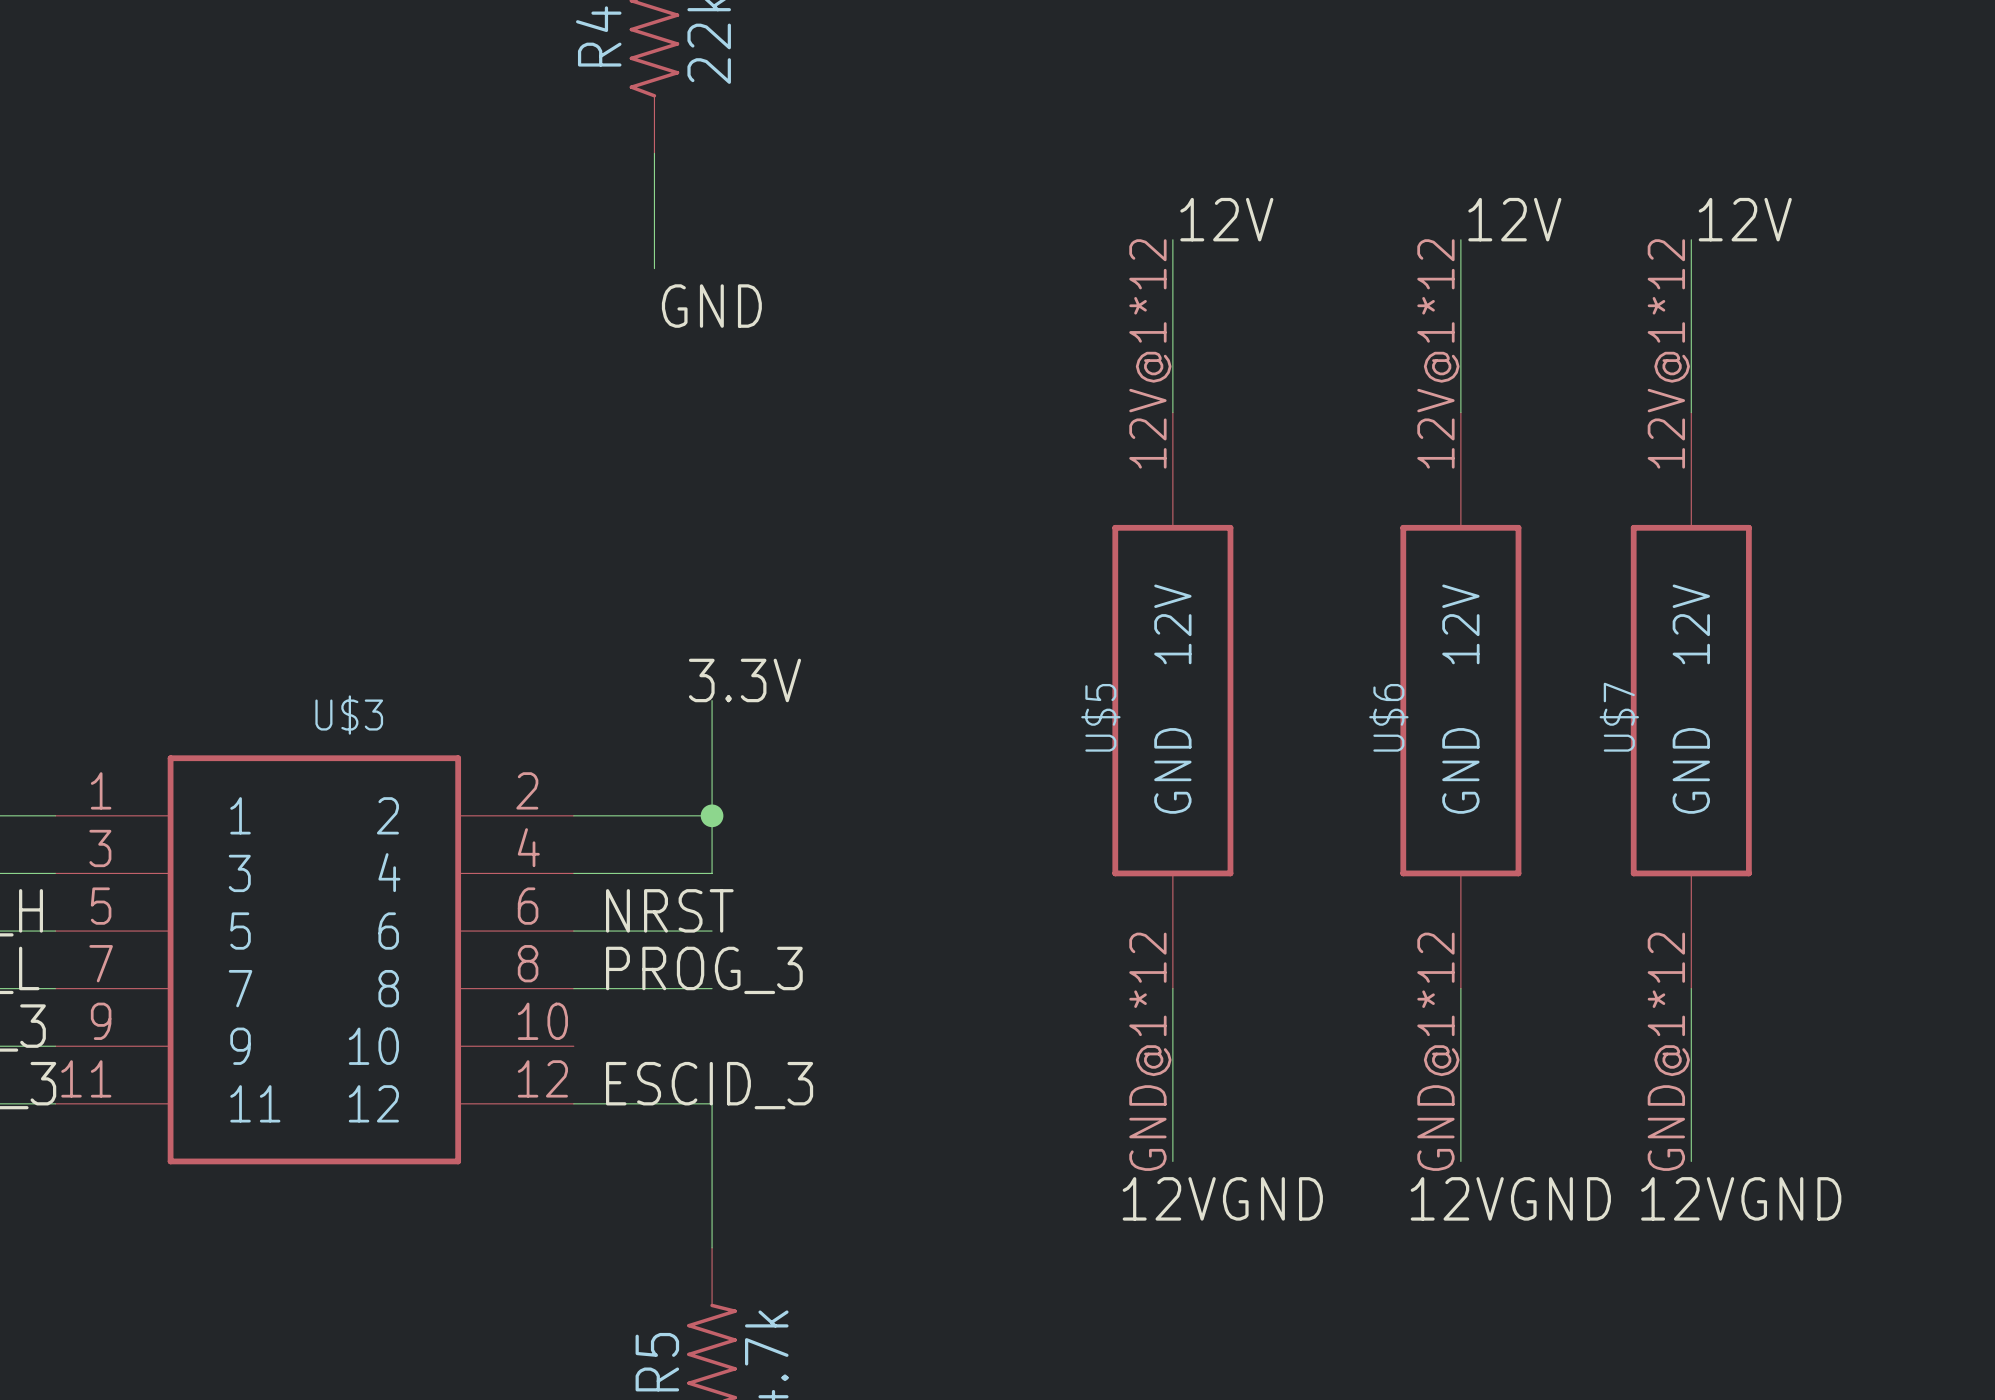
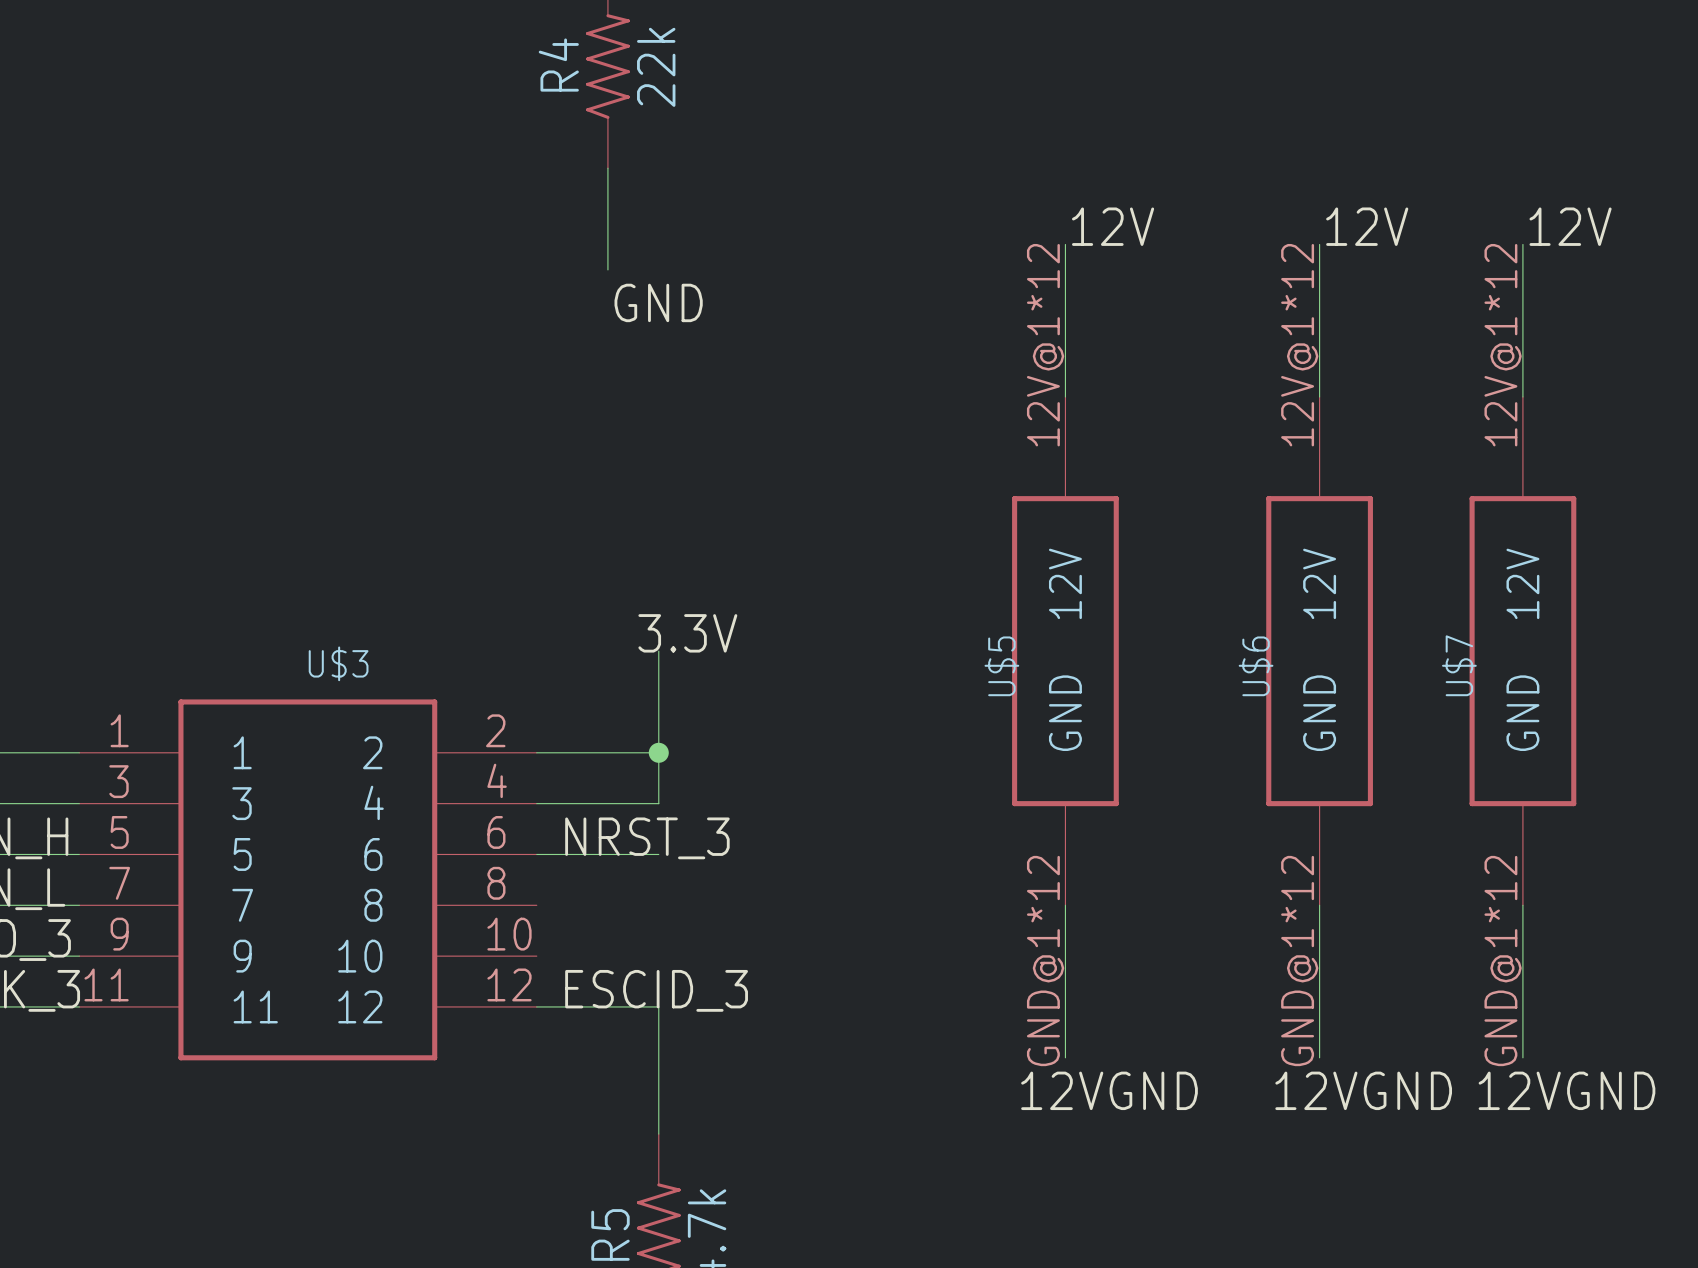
label: NRST (669, 910) -> NRST_3 (647, 838)
label: PROG_3 (704, 970) -> none
wire: (573, 988) (712, 988) -> none

